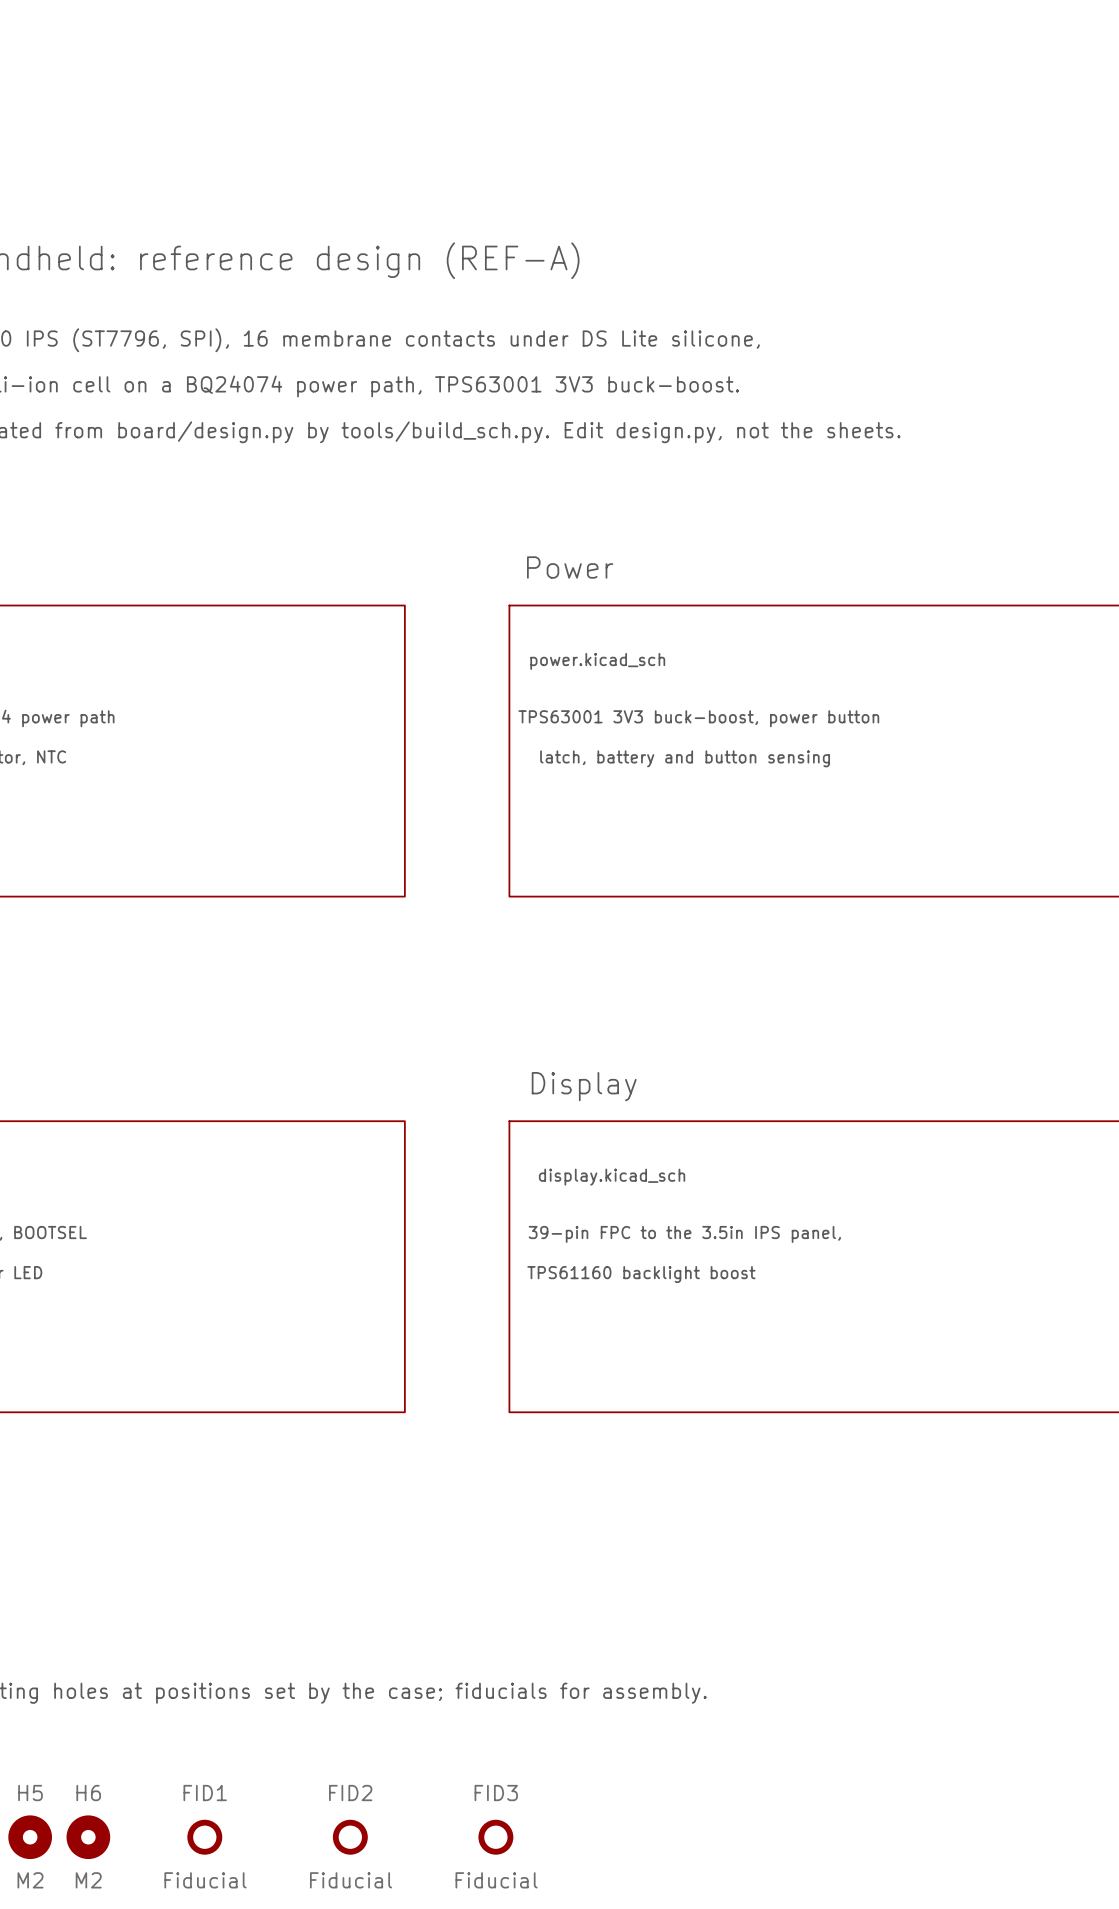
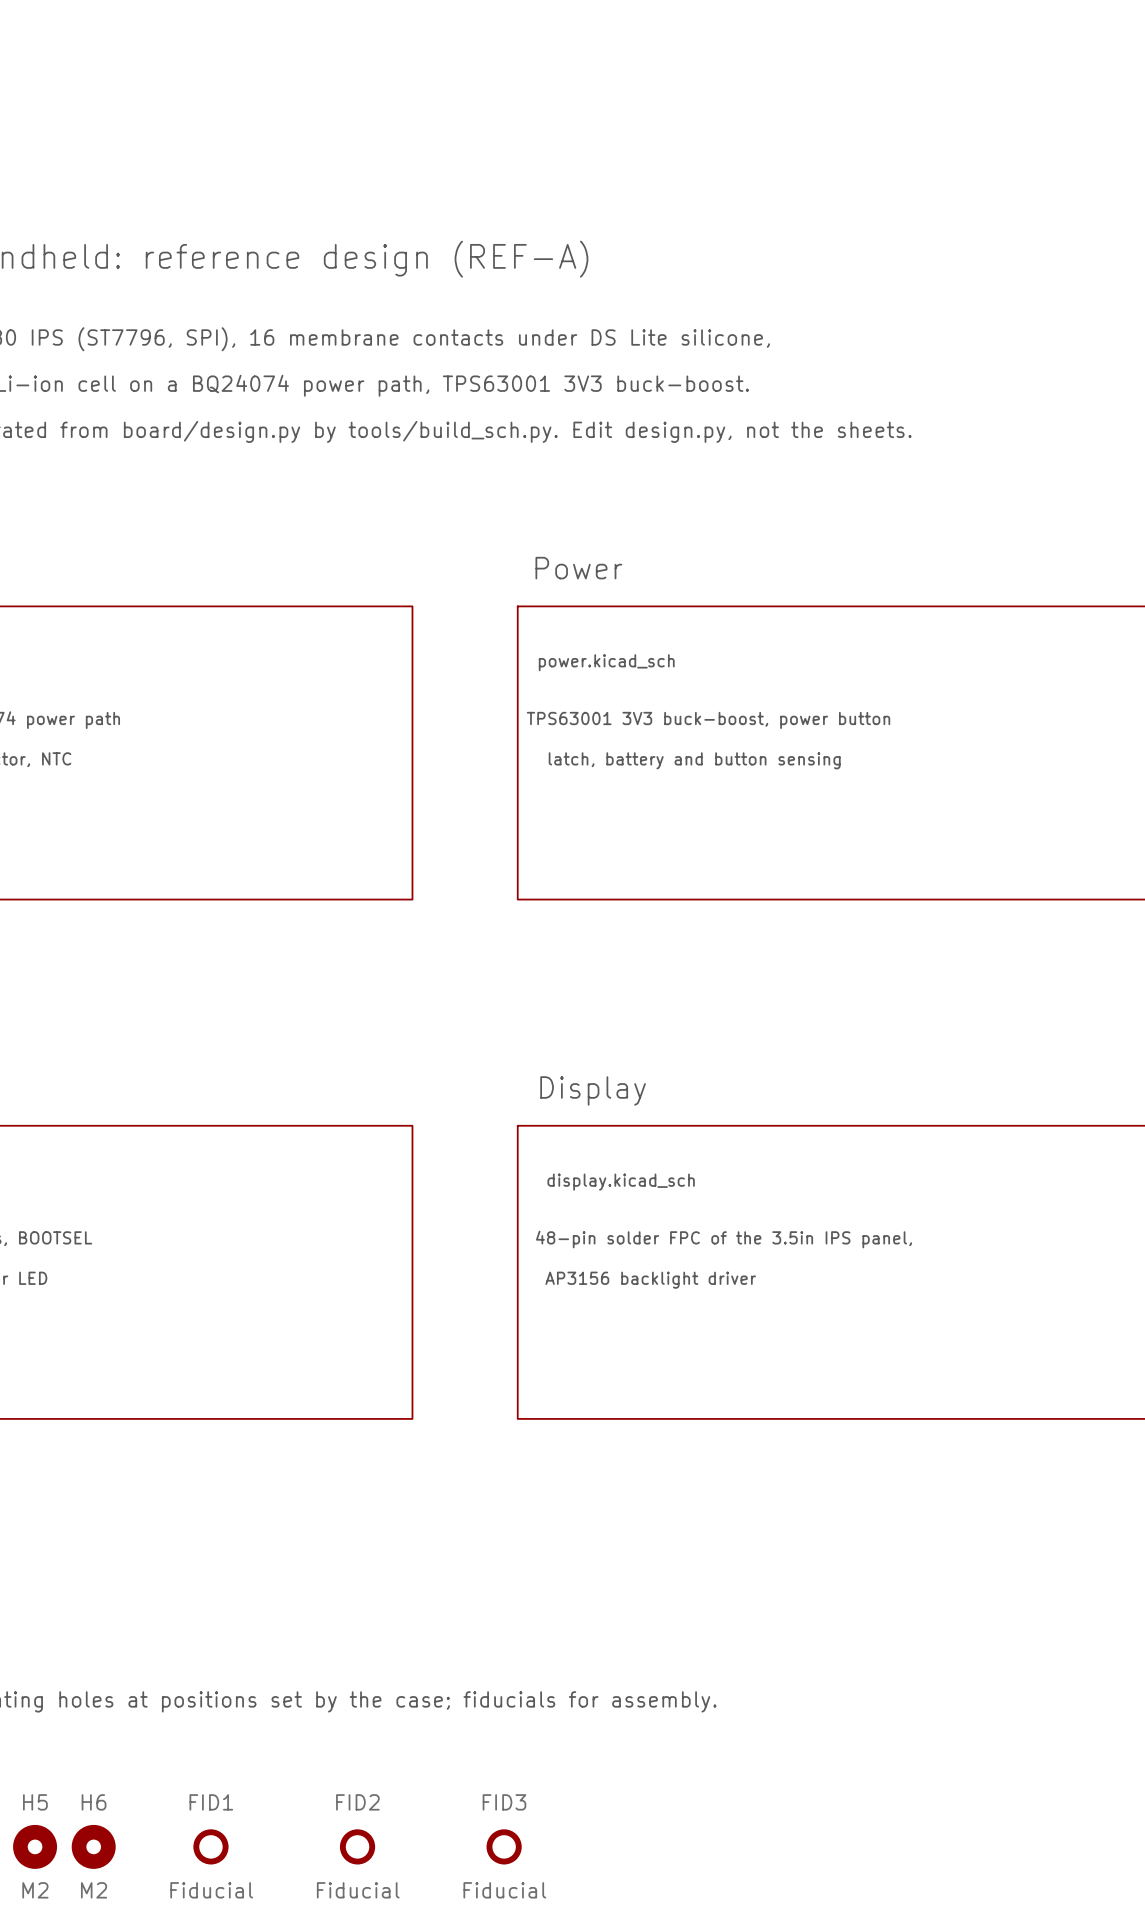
text: 39-pin FPC to the 3.5in IPS panel, (684, 1234) -> 48-pin solder FPC of the 3.5in IPS panel, (723, 1239)
text: TPS61160 backlight boost (641, 1274) -> AP3156 backlight driver (650, 1280)

